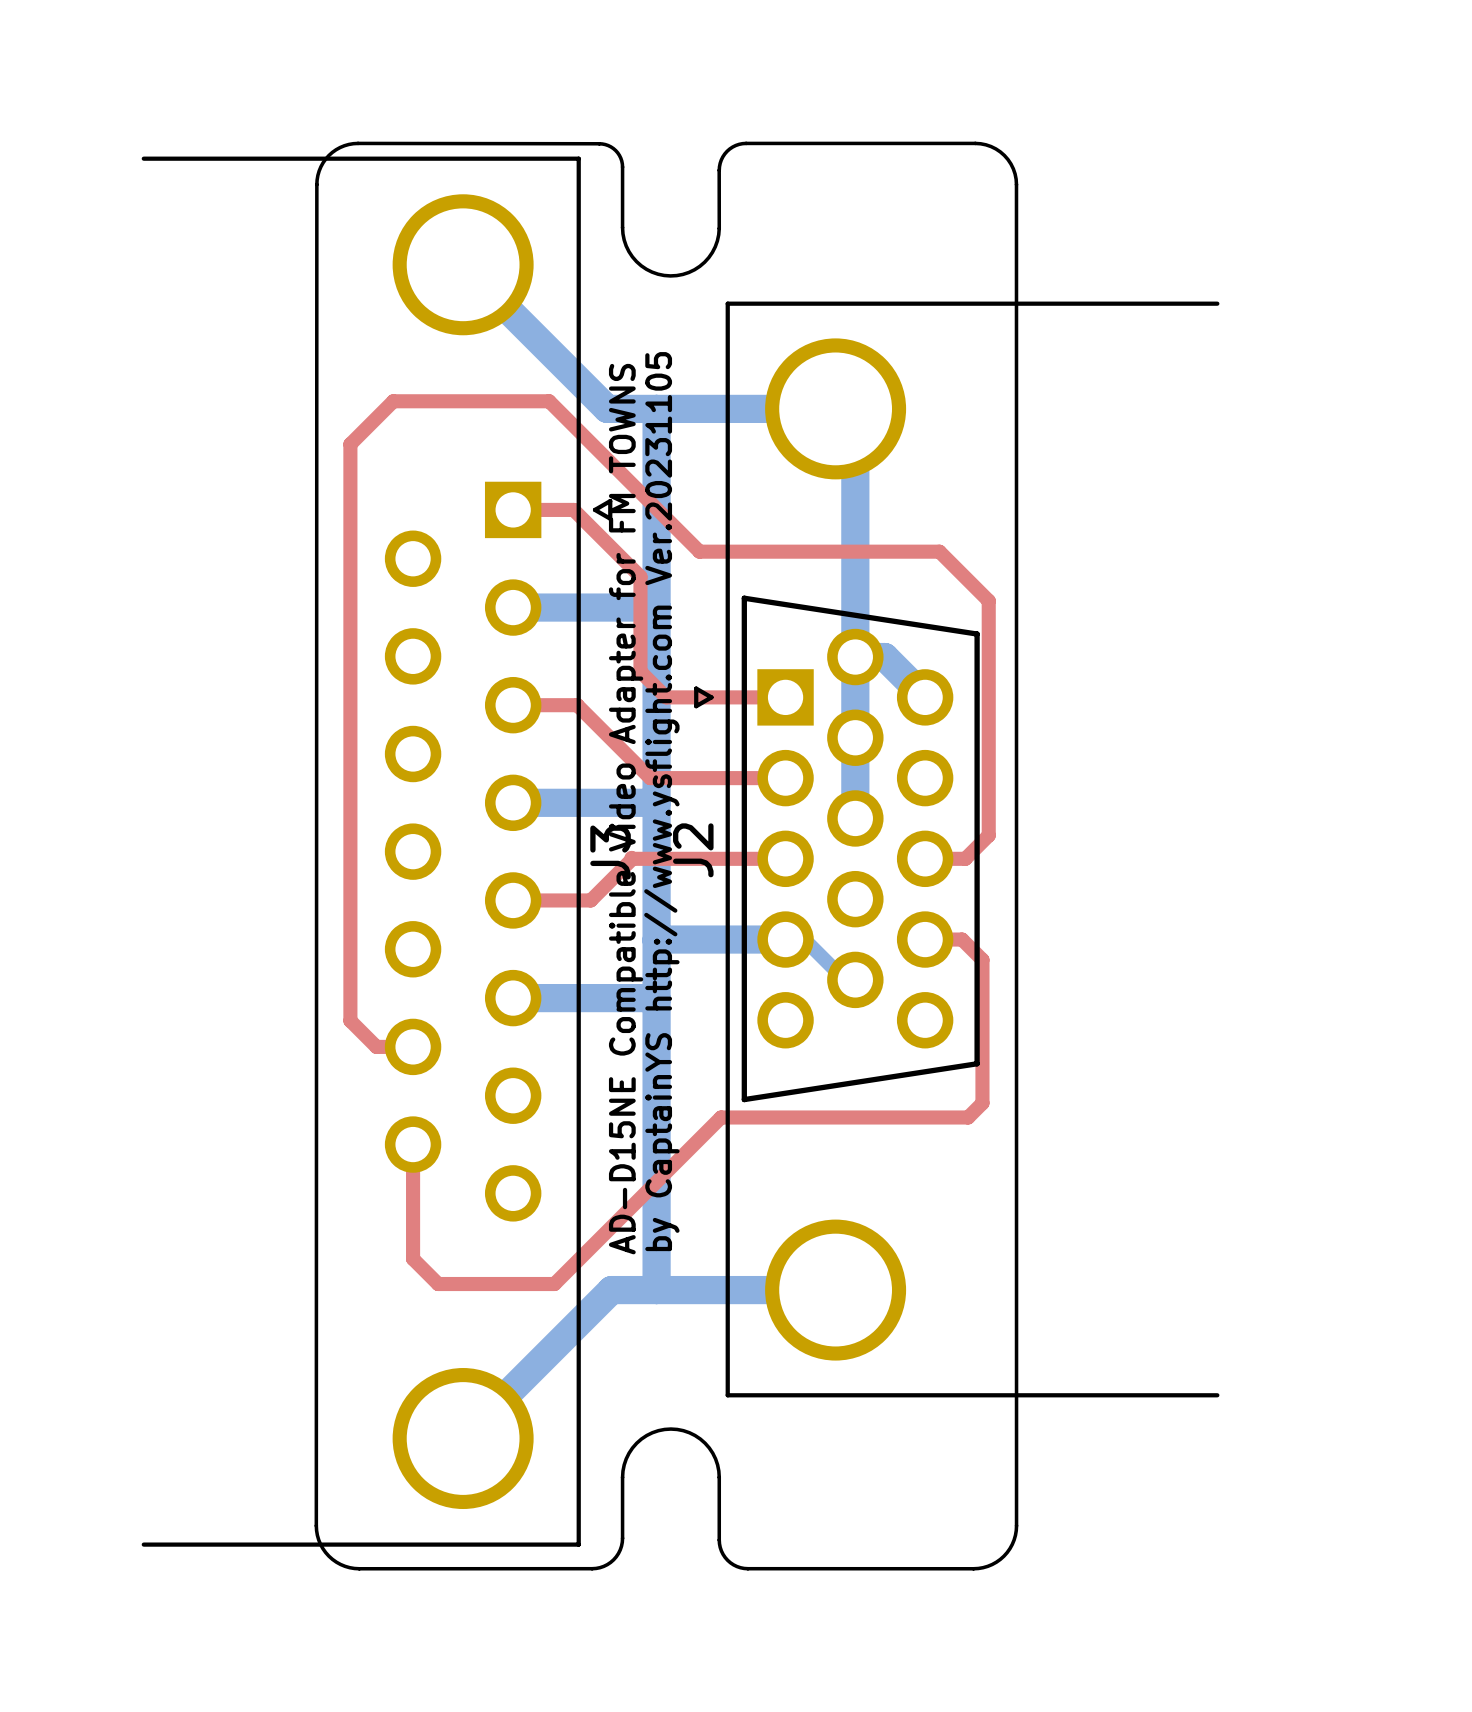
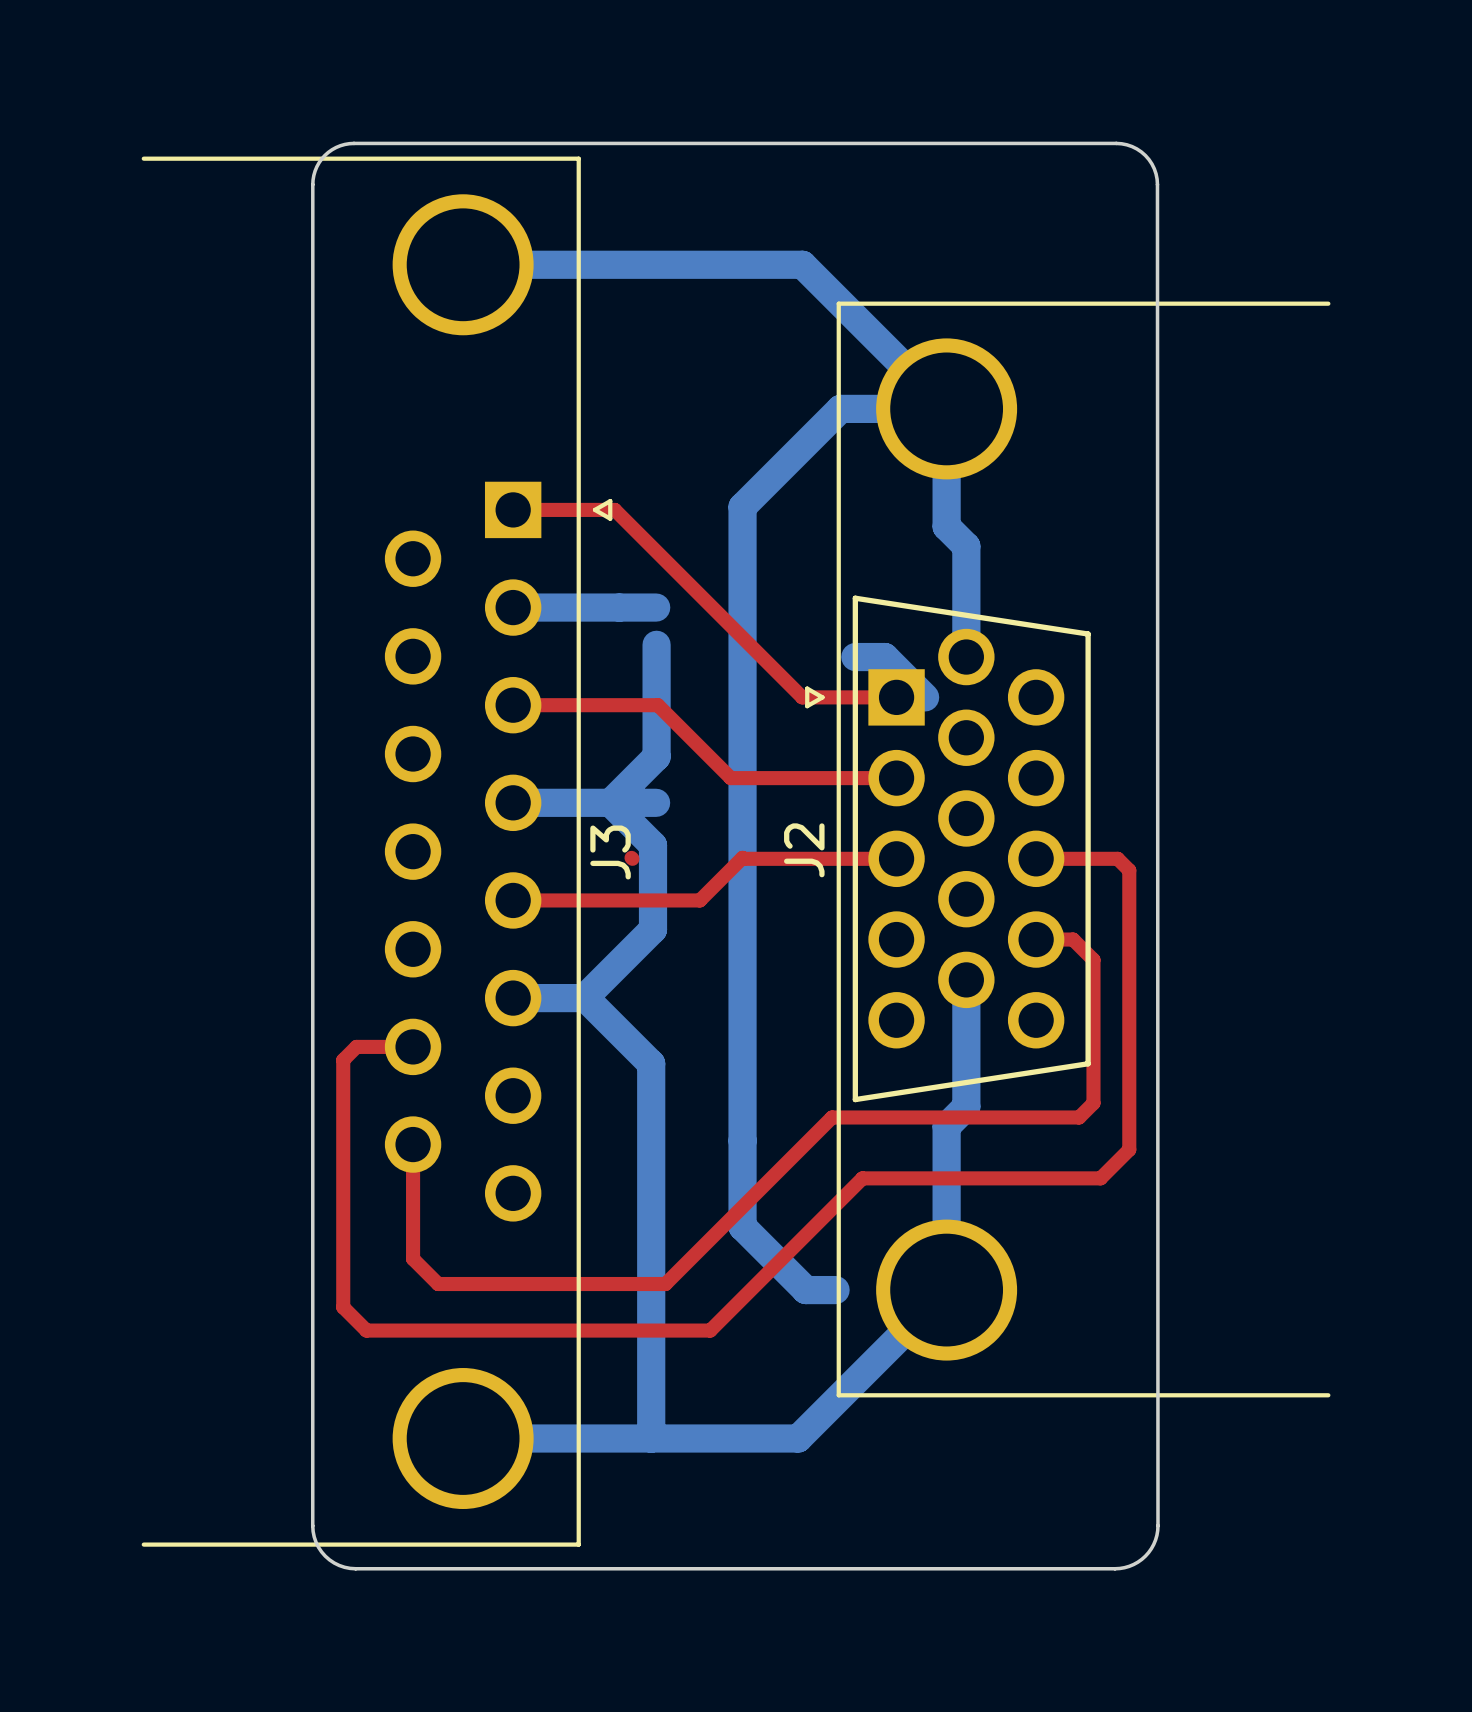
board edge: (746, 143) (729, 148) (720, 163) (718, 234) (712, 252) (704, 262) (694, 269) (676, 275) (658, 274) (646, 269) (636, 261) (628, 251) (622, 233) (621, 161) (615, 150) (605, 144) (353, 143) (340, 147) (332, 152) (323, 162) (317, 175) (316, 1525) (318, 1539) (325, 1552) (336, 1562) (349, 1567) (592, 1568) (603, 1566) (616, 1556) (621, 1546) (622, 1477) (626, 1458) (632, 1447) (646, 1435) (658, 1430) (670, 1429) (683, 1430) (695, 1435) (705, 1443) (712, 1453) (718, 1471) (720, 1547) (727, 1560) (740, 1567) (978, 1568) (992, 1564) (1000, 1559) (1012, 1544) (1016, 1525) (1016, 184) (1013, 168) (1004, 155) (991, 146) (975, 143) -> (746, 143) (349, 143) (336, 147) (324, 155) (319, 162) (313, 175) (312, 1525) (316, 1542) (321, 1551) (334, 1563) (344, 1567) (1115, 1568) (1124, 1567) (1137, 1562) (1148, 1552) (1153, 1544) (1157, 1525) (1157, 179) (1154, 168) (1145, 155) (1136, 148) (1121, 143) (975, 143)
bottom track: (463, 264) (607, 408) (835, 408) (855, 428) (855, 818) -> (463, 264) (802, 264) (946, 408)
bottom track: (656, 408) (656, 644) -> none
bottom track: none -> (946, 408) (946, 526) (966, 546) (966, 657)
bottom track: none -> (946, 408) (840, 408) (742, 506) (742, 1226) (805, 1290)
top track: (573, 509) (640, 576) (640, 671) (666, 697) (785, 697) -> (573, 509) (614, 509) (802, 697) (896, 697)
line: (744, 598) (744, 1099) (977, 1063) (977, 634) (744, 598) -> (855, 598) (855, 1099) (1088, 1063) (1088, 634) (855, 598)
top track: (577, 705) (650, 778) (730, 778) -> (577, 705) (657, 705) (730, 778)
bottom track: (656, 756) (656, 1290) -> (656, 756) (610, 802) (653, 845) (653, 929) (585, 996) (651, 1063) (651, 1438)
top track: none -> (785, 778) (896, 778)
text: by CaptainYS http://www.ysflight.com Ver.20231105 (661, 801) -> none
text: AD-D15NE Compatible Video Adapter for FM TOWNS (626, 809) -> none
J2 position: (956, 849) -> (1067, 849)
top track: (743, 858) (632, 858) (590, 900) -> (743, 858) (699, 900) (590, 900)
top track: none -> (785, 858) (896, 858)
top track: (925, 858) (965, 858) (988, 835) (988, 600) (939, 551) (699, 551) (549, 401) (393, 401) (350, 444) (350, 1020) (376, 1046) -> (1036, 858) (1117, 858) (1129, 870) (1129, 1149) (1100, 1178) (862, 1178) (710, 1330) (366, 1330) (343, 1307) (343, 1060) (356, 1046) (376, 1046)
top track: (925, 939) (962, 939) (982, 959) (982, 1103) (968, 1117) -> (1036, 939) (1073, 939) (1093, 959) (1093, 1103) (1079, 1117) (968, 1117)
bottom track: (656, 940) (804, 939) (844, 979) (855, 979) -> none
bottom track: none -> (966, 979) (966, 1106) (946, 1126) (946, 1290)
bottom track: (585, 998) (656, 999) -> none
top track: (832, 1117) (721, 1117) (554, 1284) -> (832, 1117) (665, 1284) (554, 1284)
bottom track: (805, 1290) (611, 1290) (463, 1438) -> (946, 1290) (798, 1438) (463, 1438)

